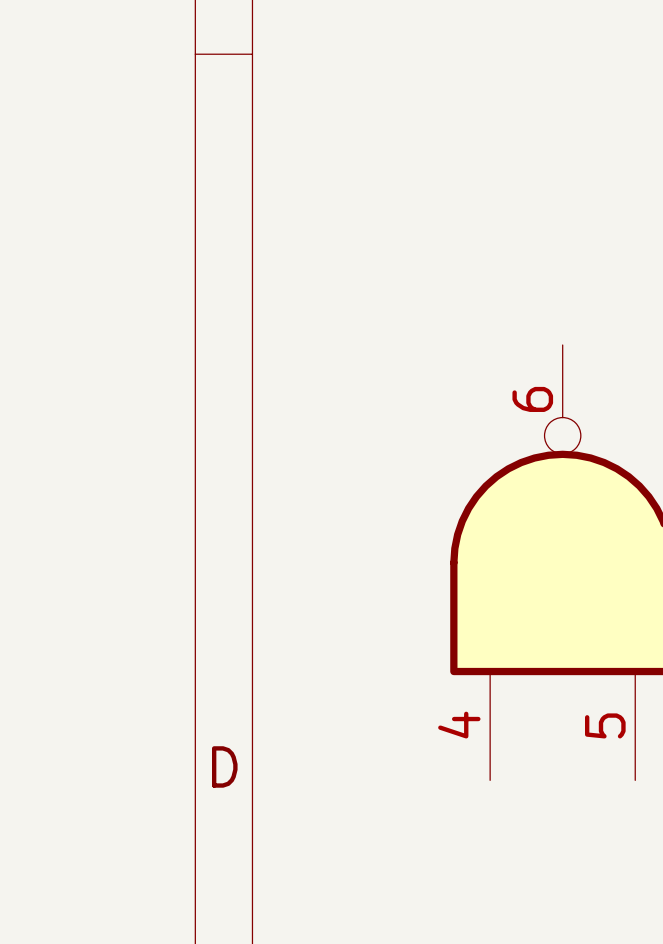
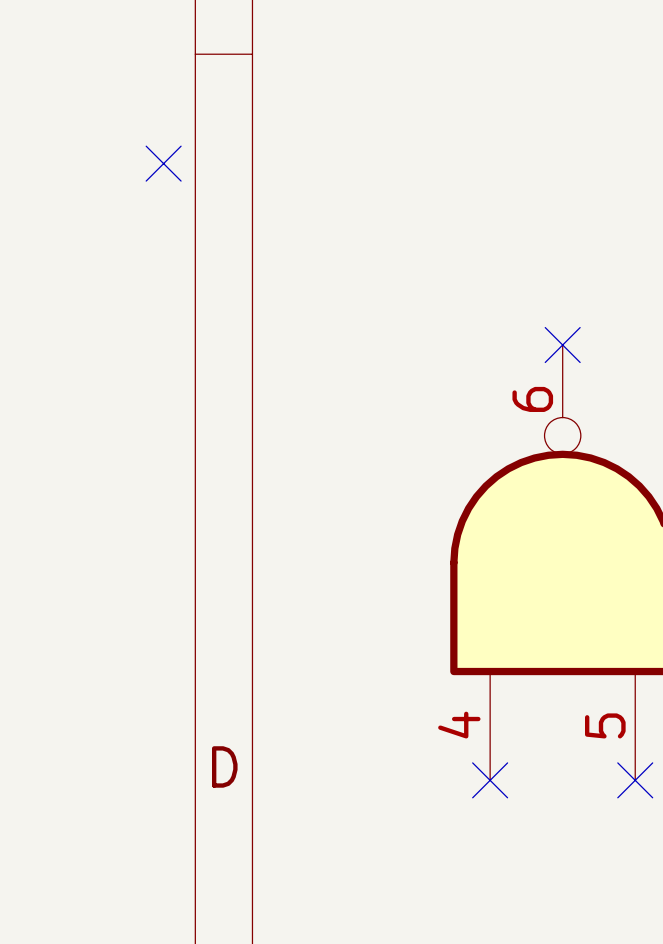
no-connect mark: none -> (163, 163)
no-connect mark: none -> (562, 345)
no-connect mark: none -> (490, 780)
no-connect mark: none -> (635, 780)

